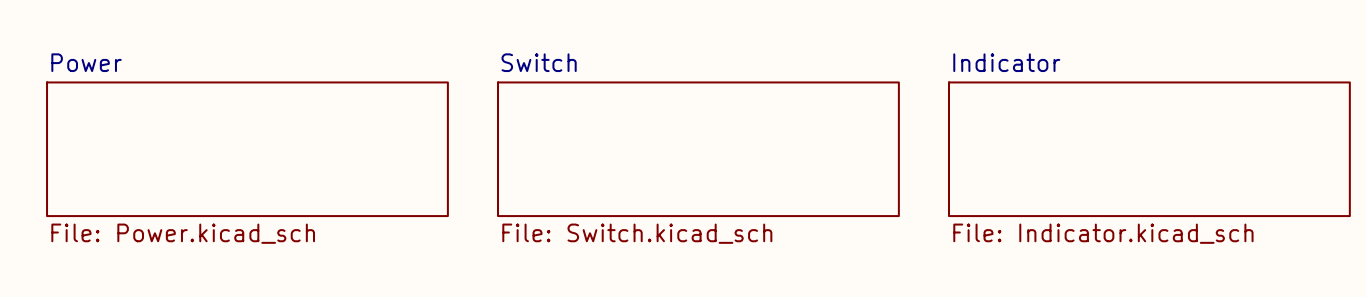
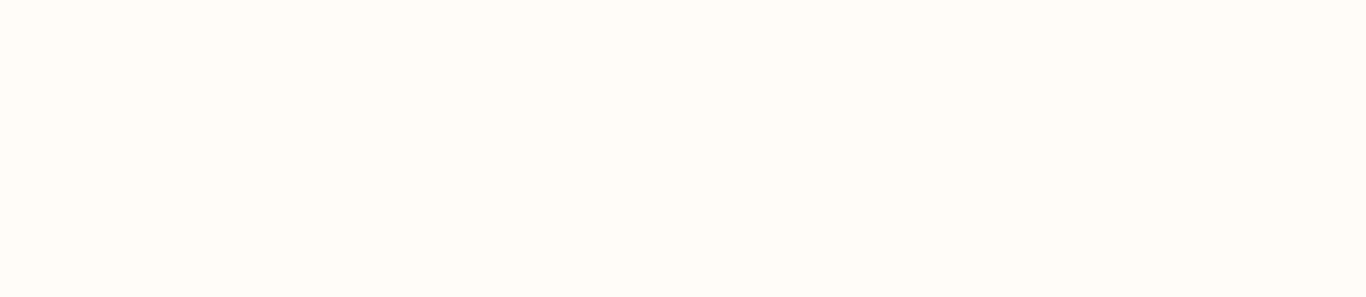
sheet Power: File: Power.kicad_sch (247, 149) -> none
sheet Switch: File: Switch.kicad_sch (698, 149) -> none
sheet Indicator: File: Indicator.kicad_sch (1149, 149) -> none

